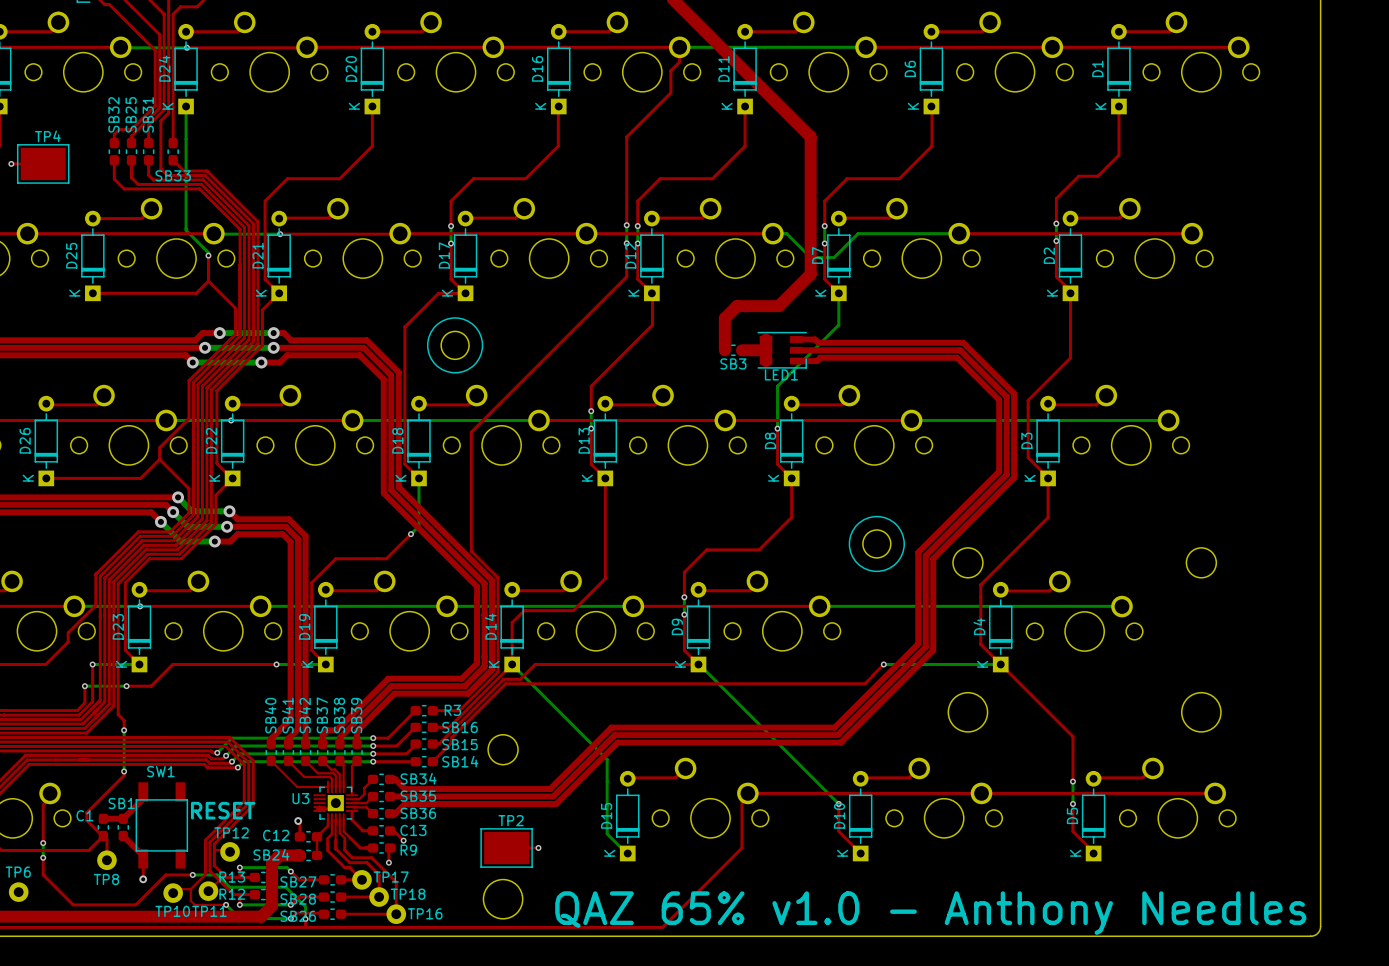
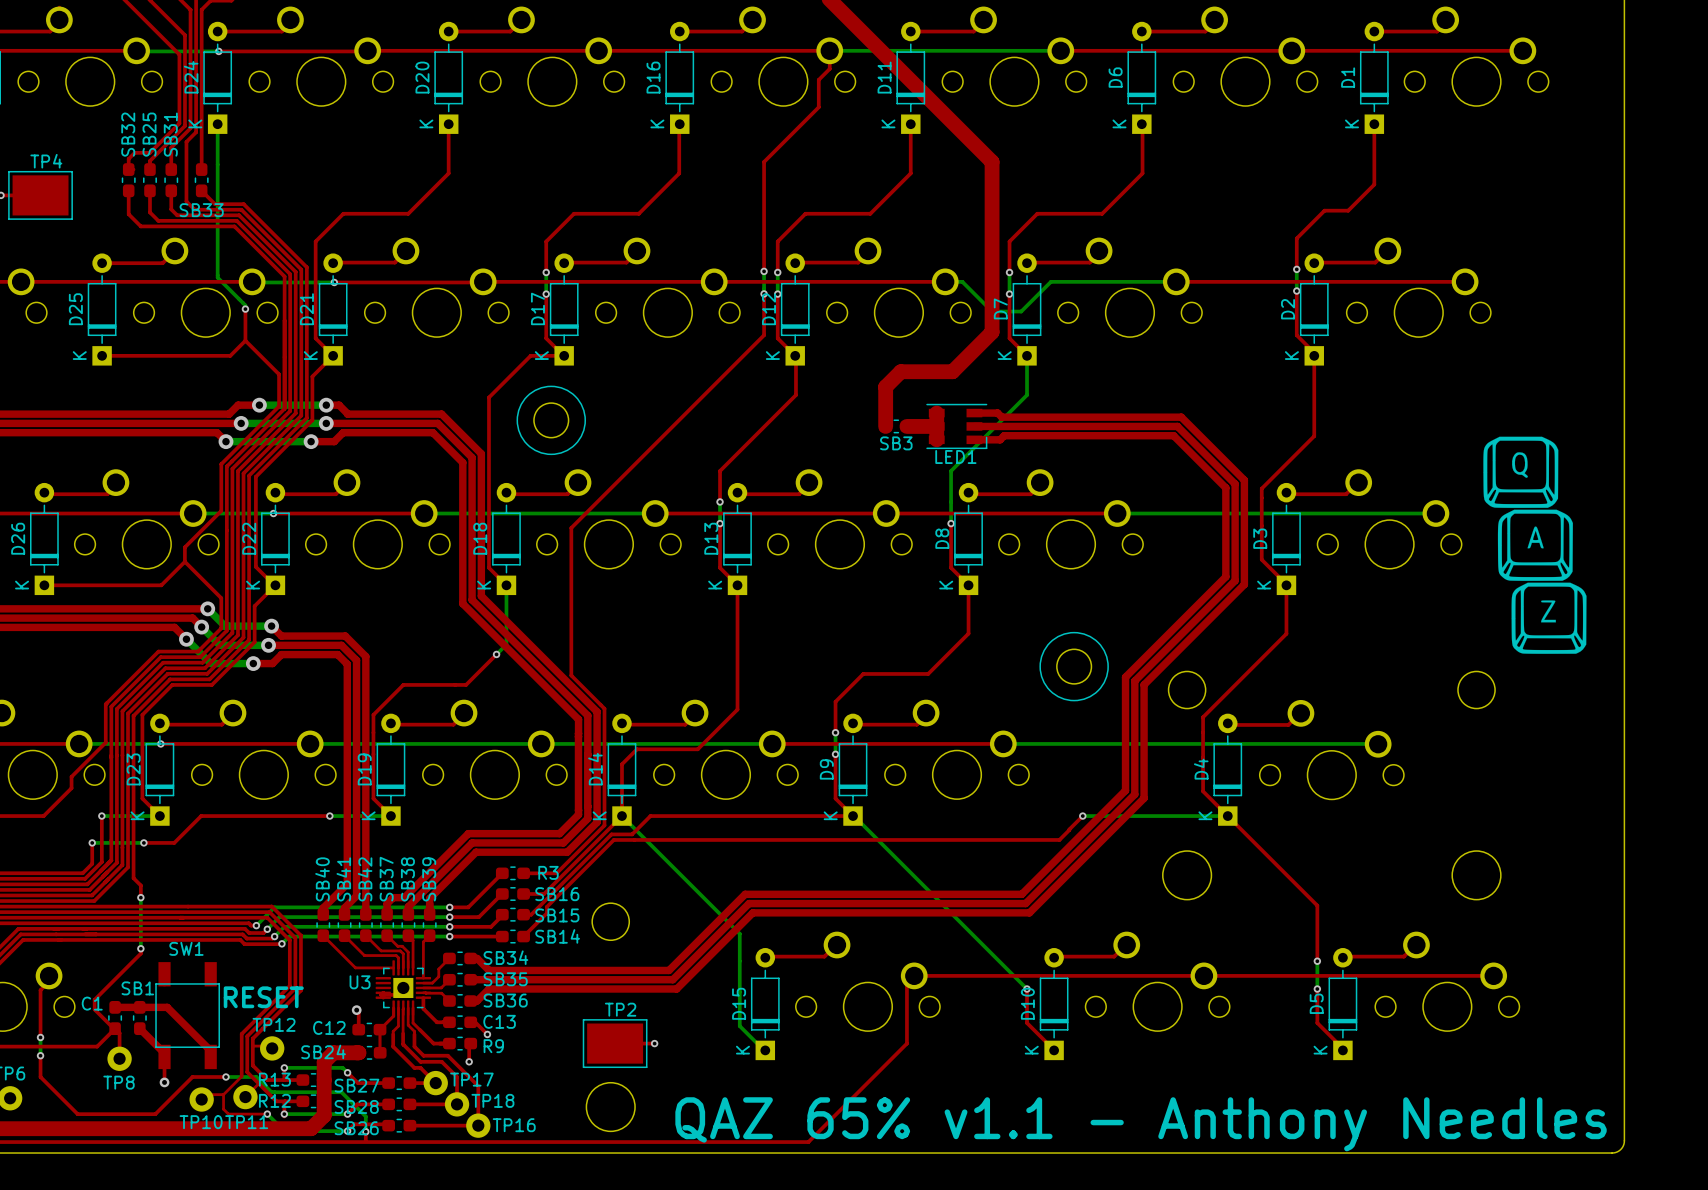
drawing: none -> [1483, 436, 1587, 654]
top track: (143, 798) (123, 818) -> (210, 1056) (210, 1050) (167, 1007) (139, 1007)
text: QAZ 65% v1.0 - Anthony Needles (930, 913) -> QAZ 65% v1.1 - Anthony Needles (1141, 1124)

